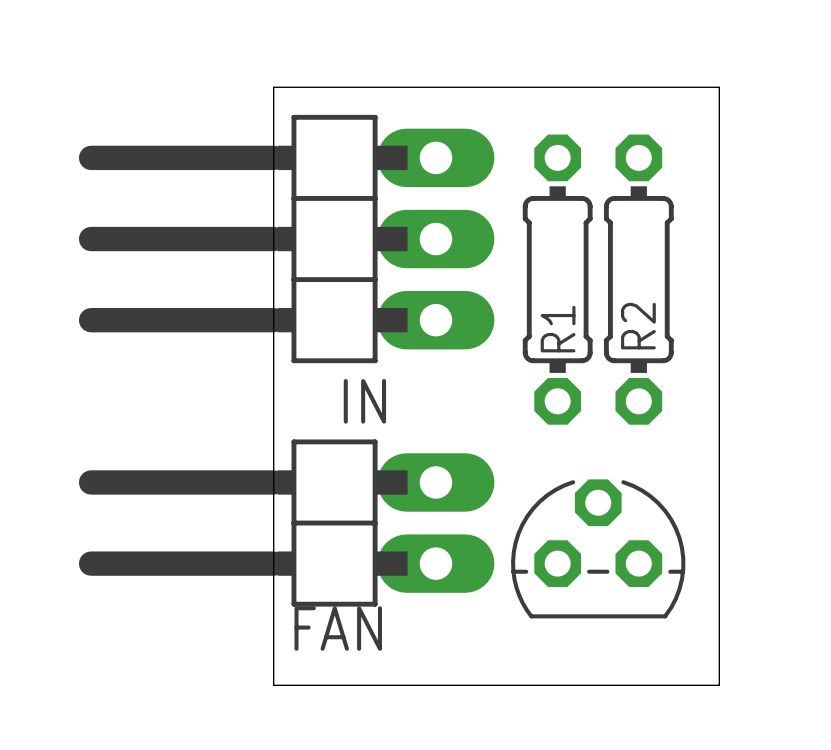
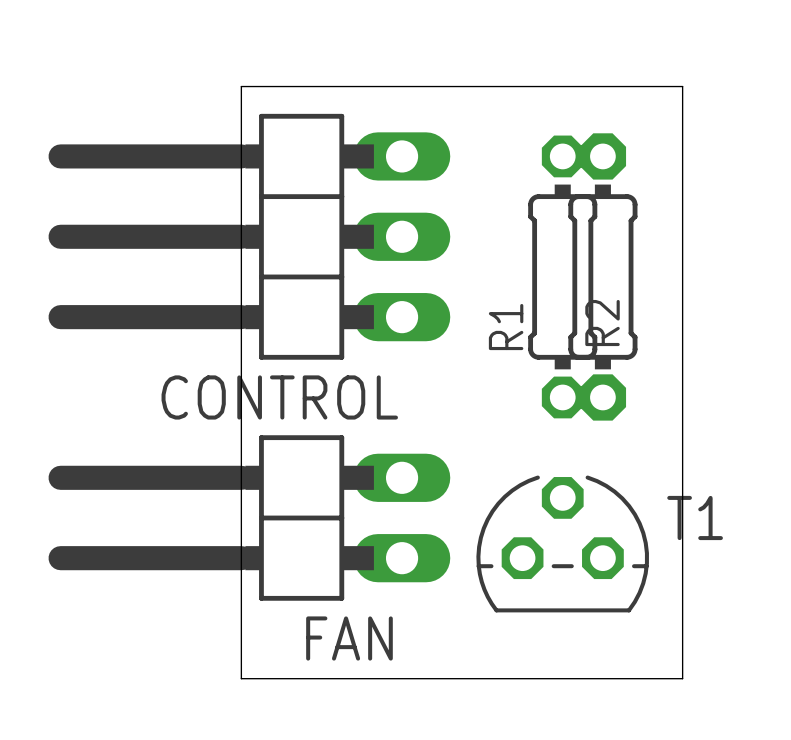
R1 footprint: [522, 134, 593, 425] -> [528, 135, 598, 419]
CONTROL: none -> (249, 236)
IN: (286, 239) -> none
FAN footprint: [78, 439, 495, 607] -> [48, 435, 451, 601]
part: (598, 548) -> none
T1: none -> (562, 543)
FAN name position: FAN (338, 628) -> FAN (349, 638)

